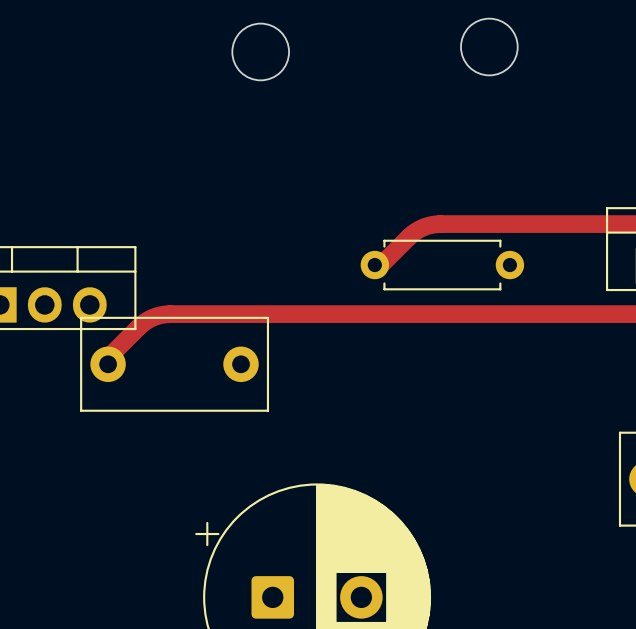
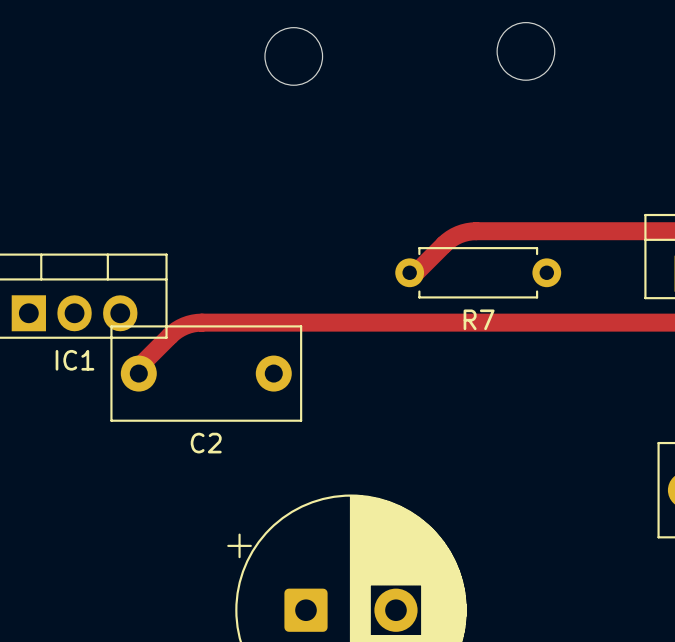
R7 name: none -> R7 (479, 319)
IC1 name: none -> IC1 (74, 360)
C2 name: none -> C2 (206, 443)

